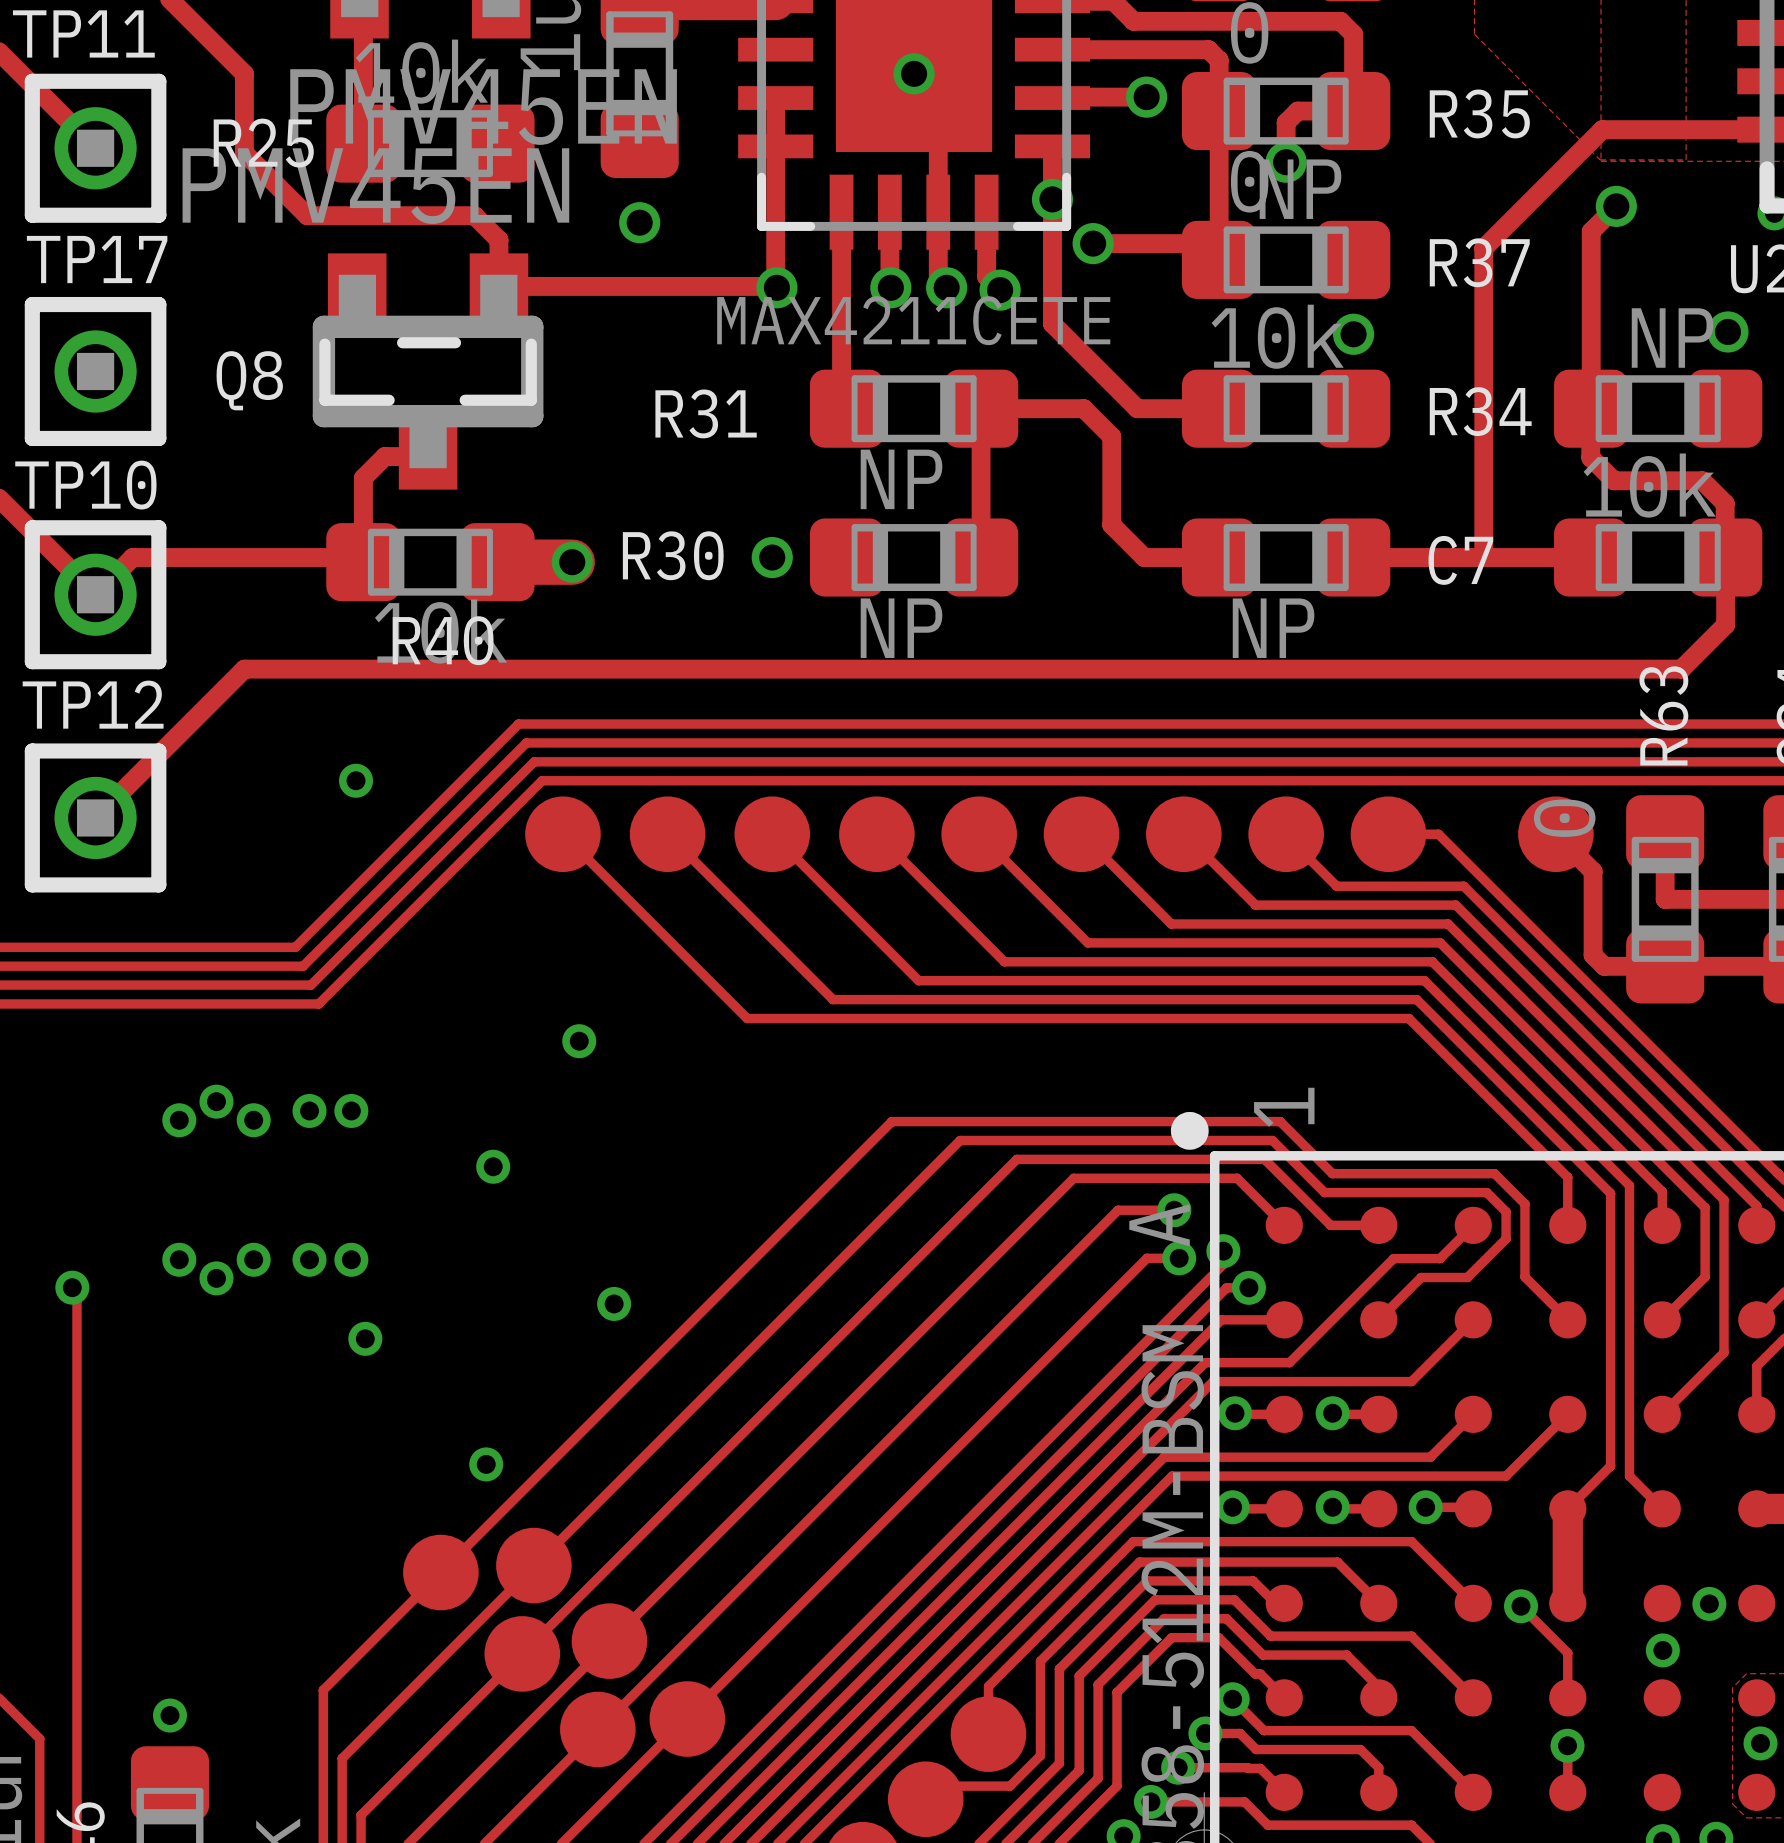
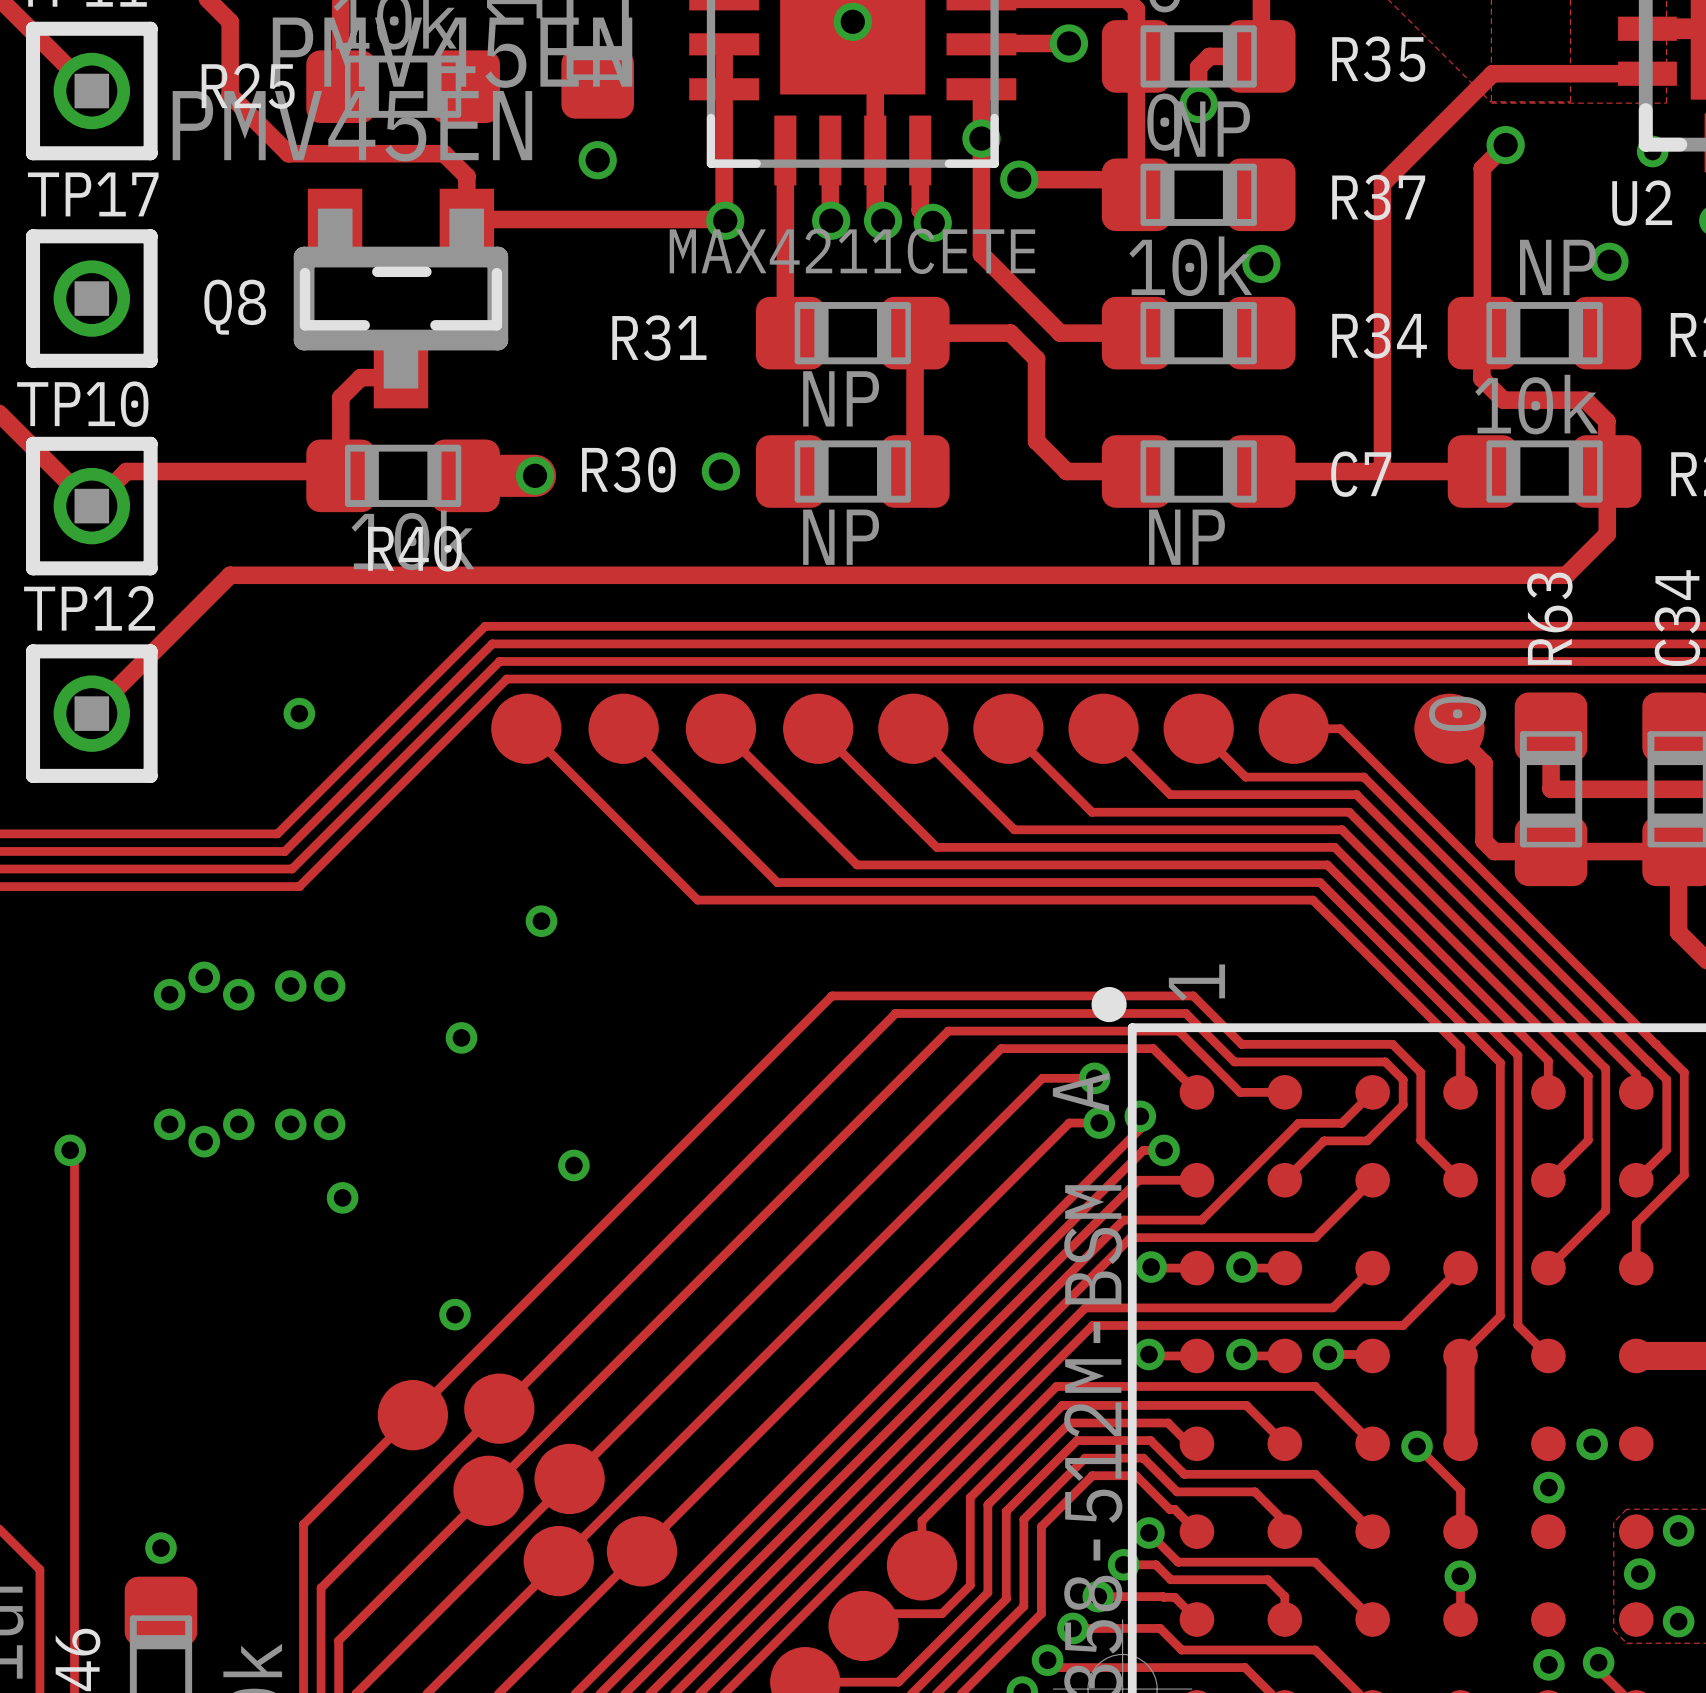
via position: (356, 780) -> (299, 713)

